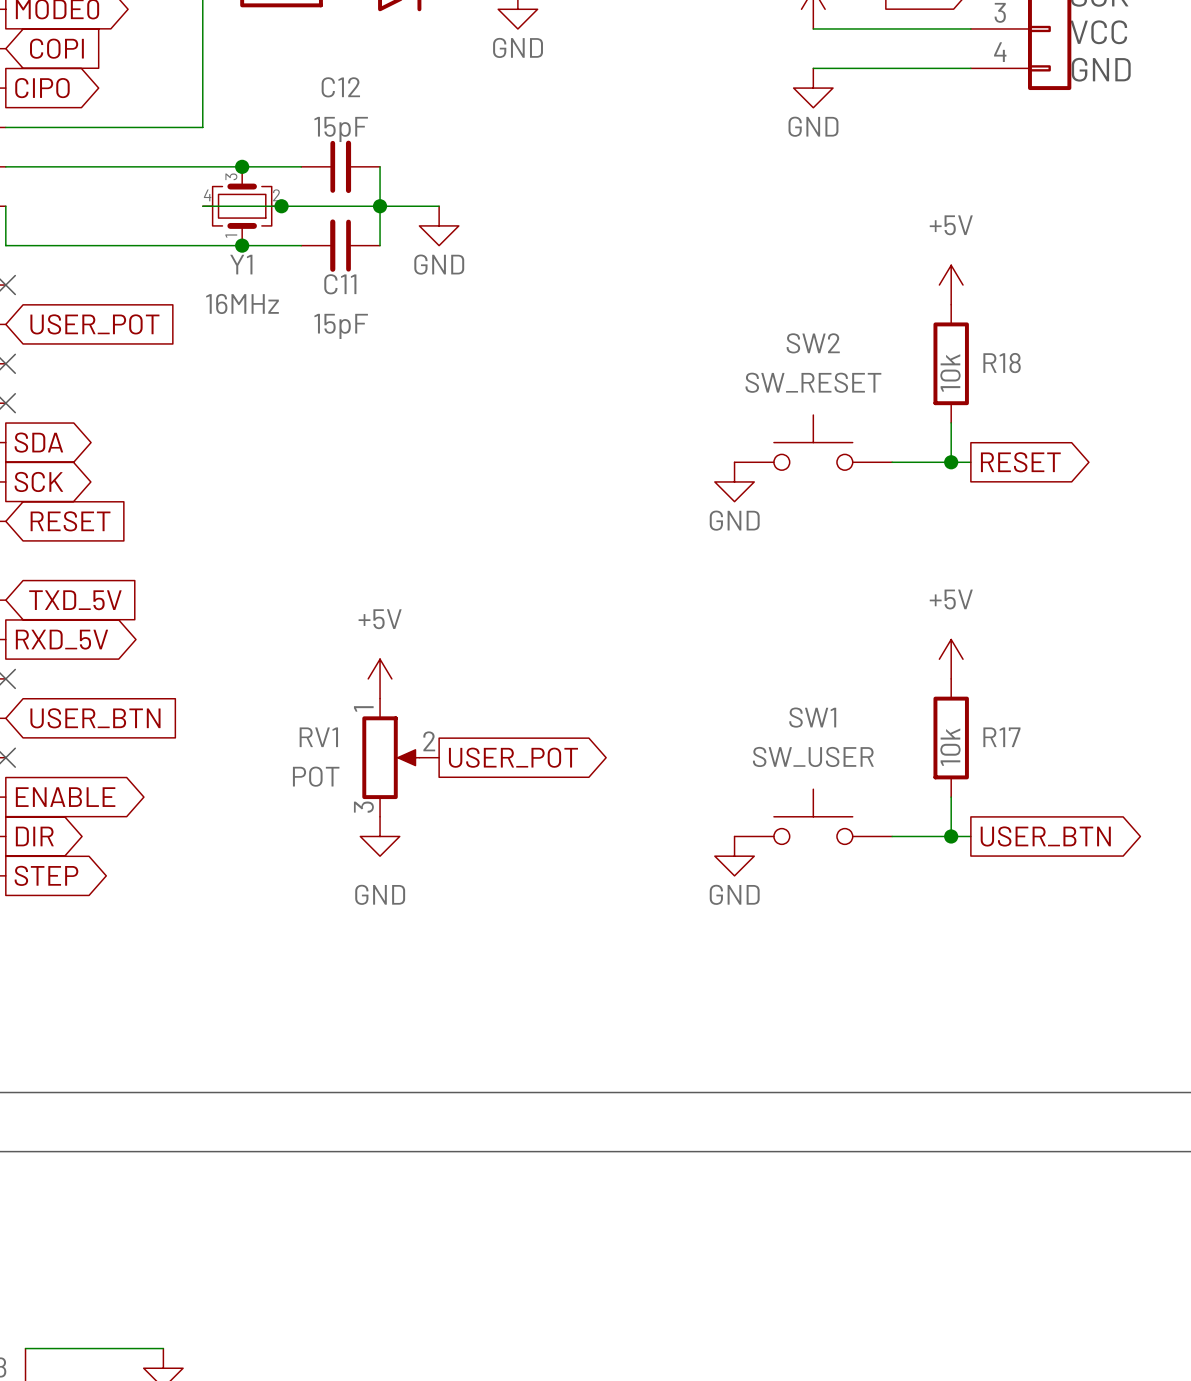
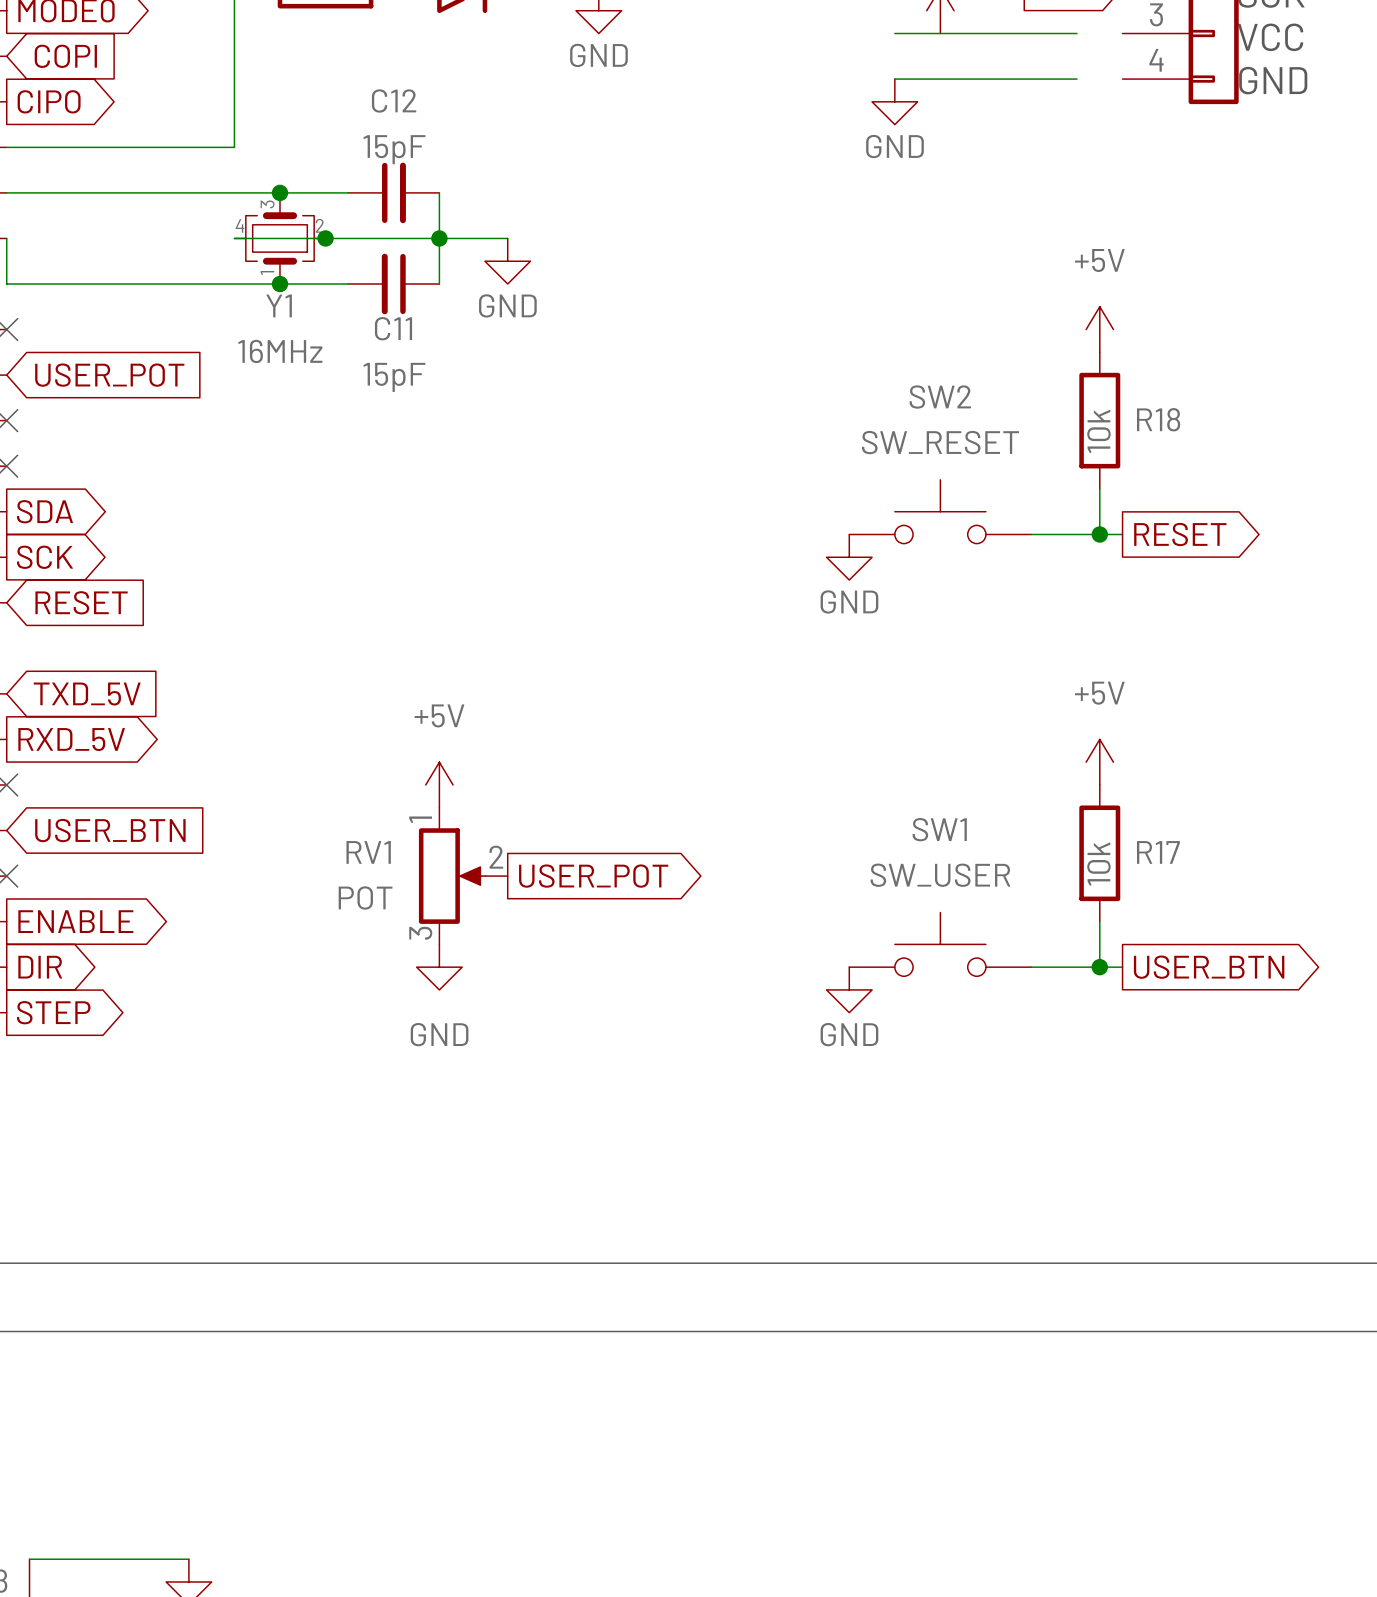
wire: (931, 28) (970, 28) -> (894, 33) (940, 33)
wire: (931, 68) (970, 68) -> (894, 79) (940, 79)
power symbol position: GND (813, 88) -> GND (894, 101)

